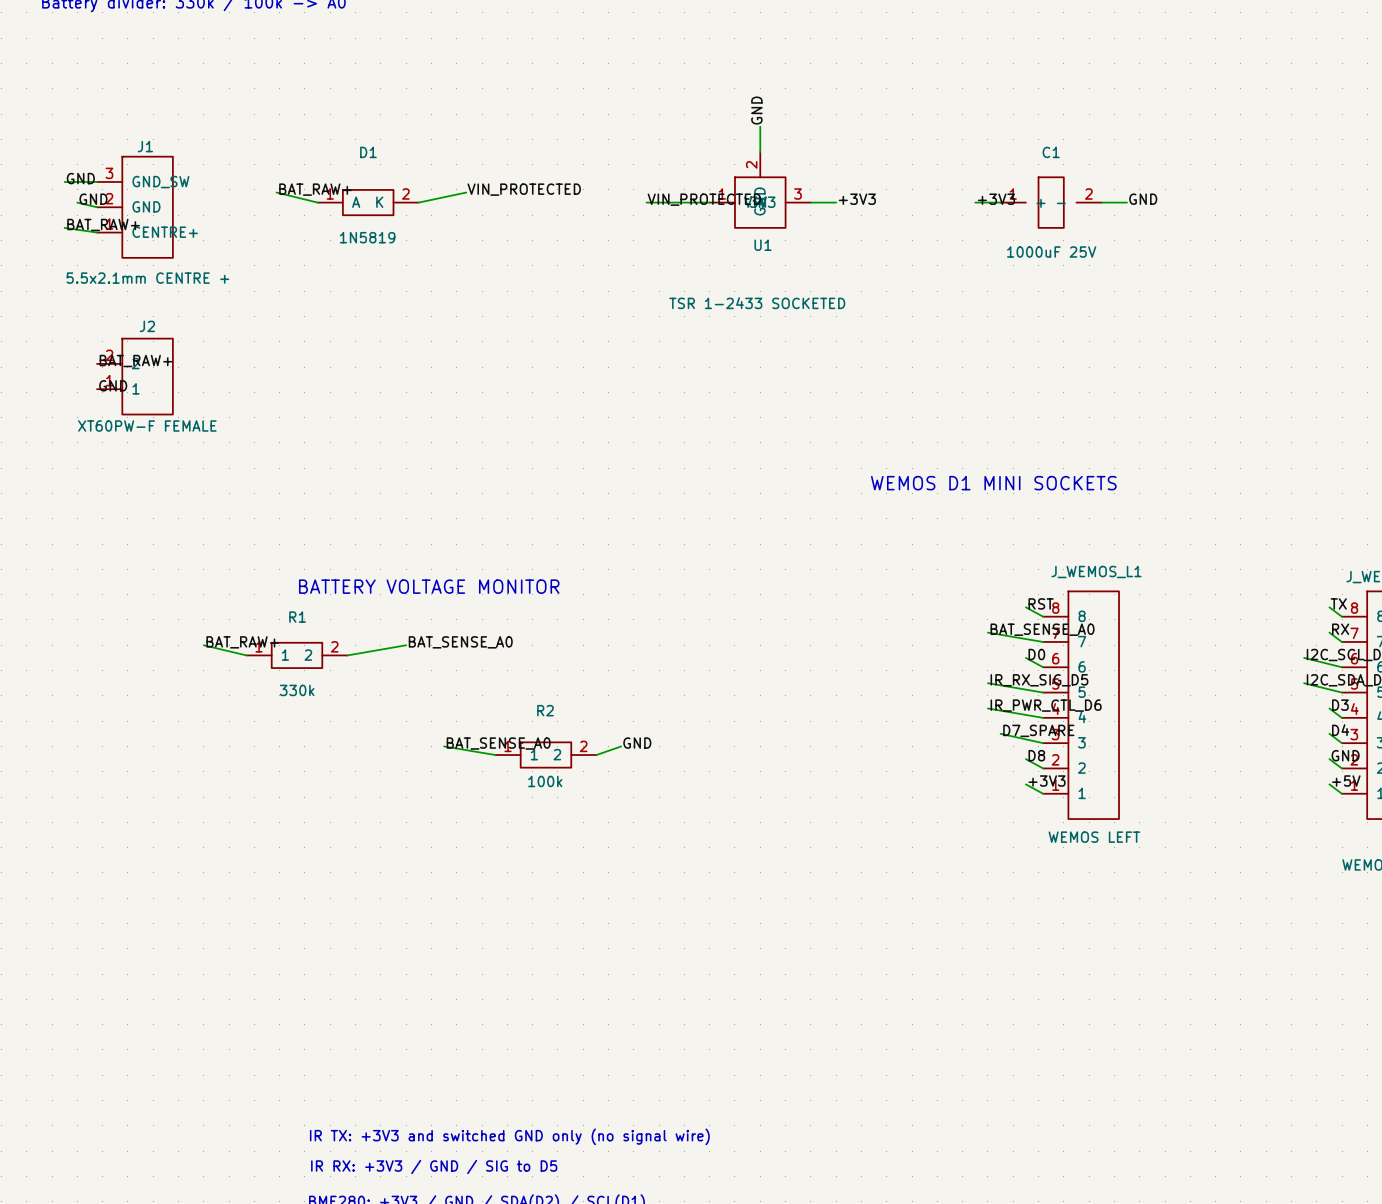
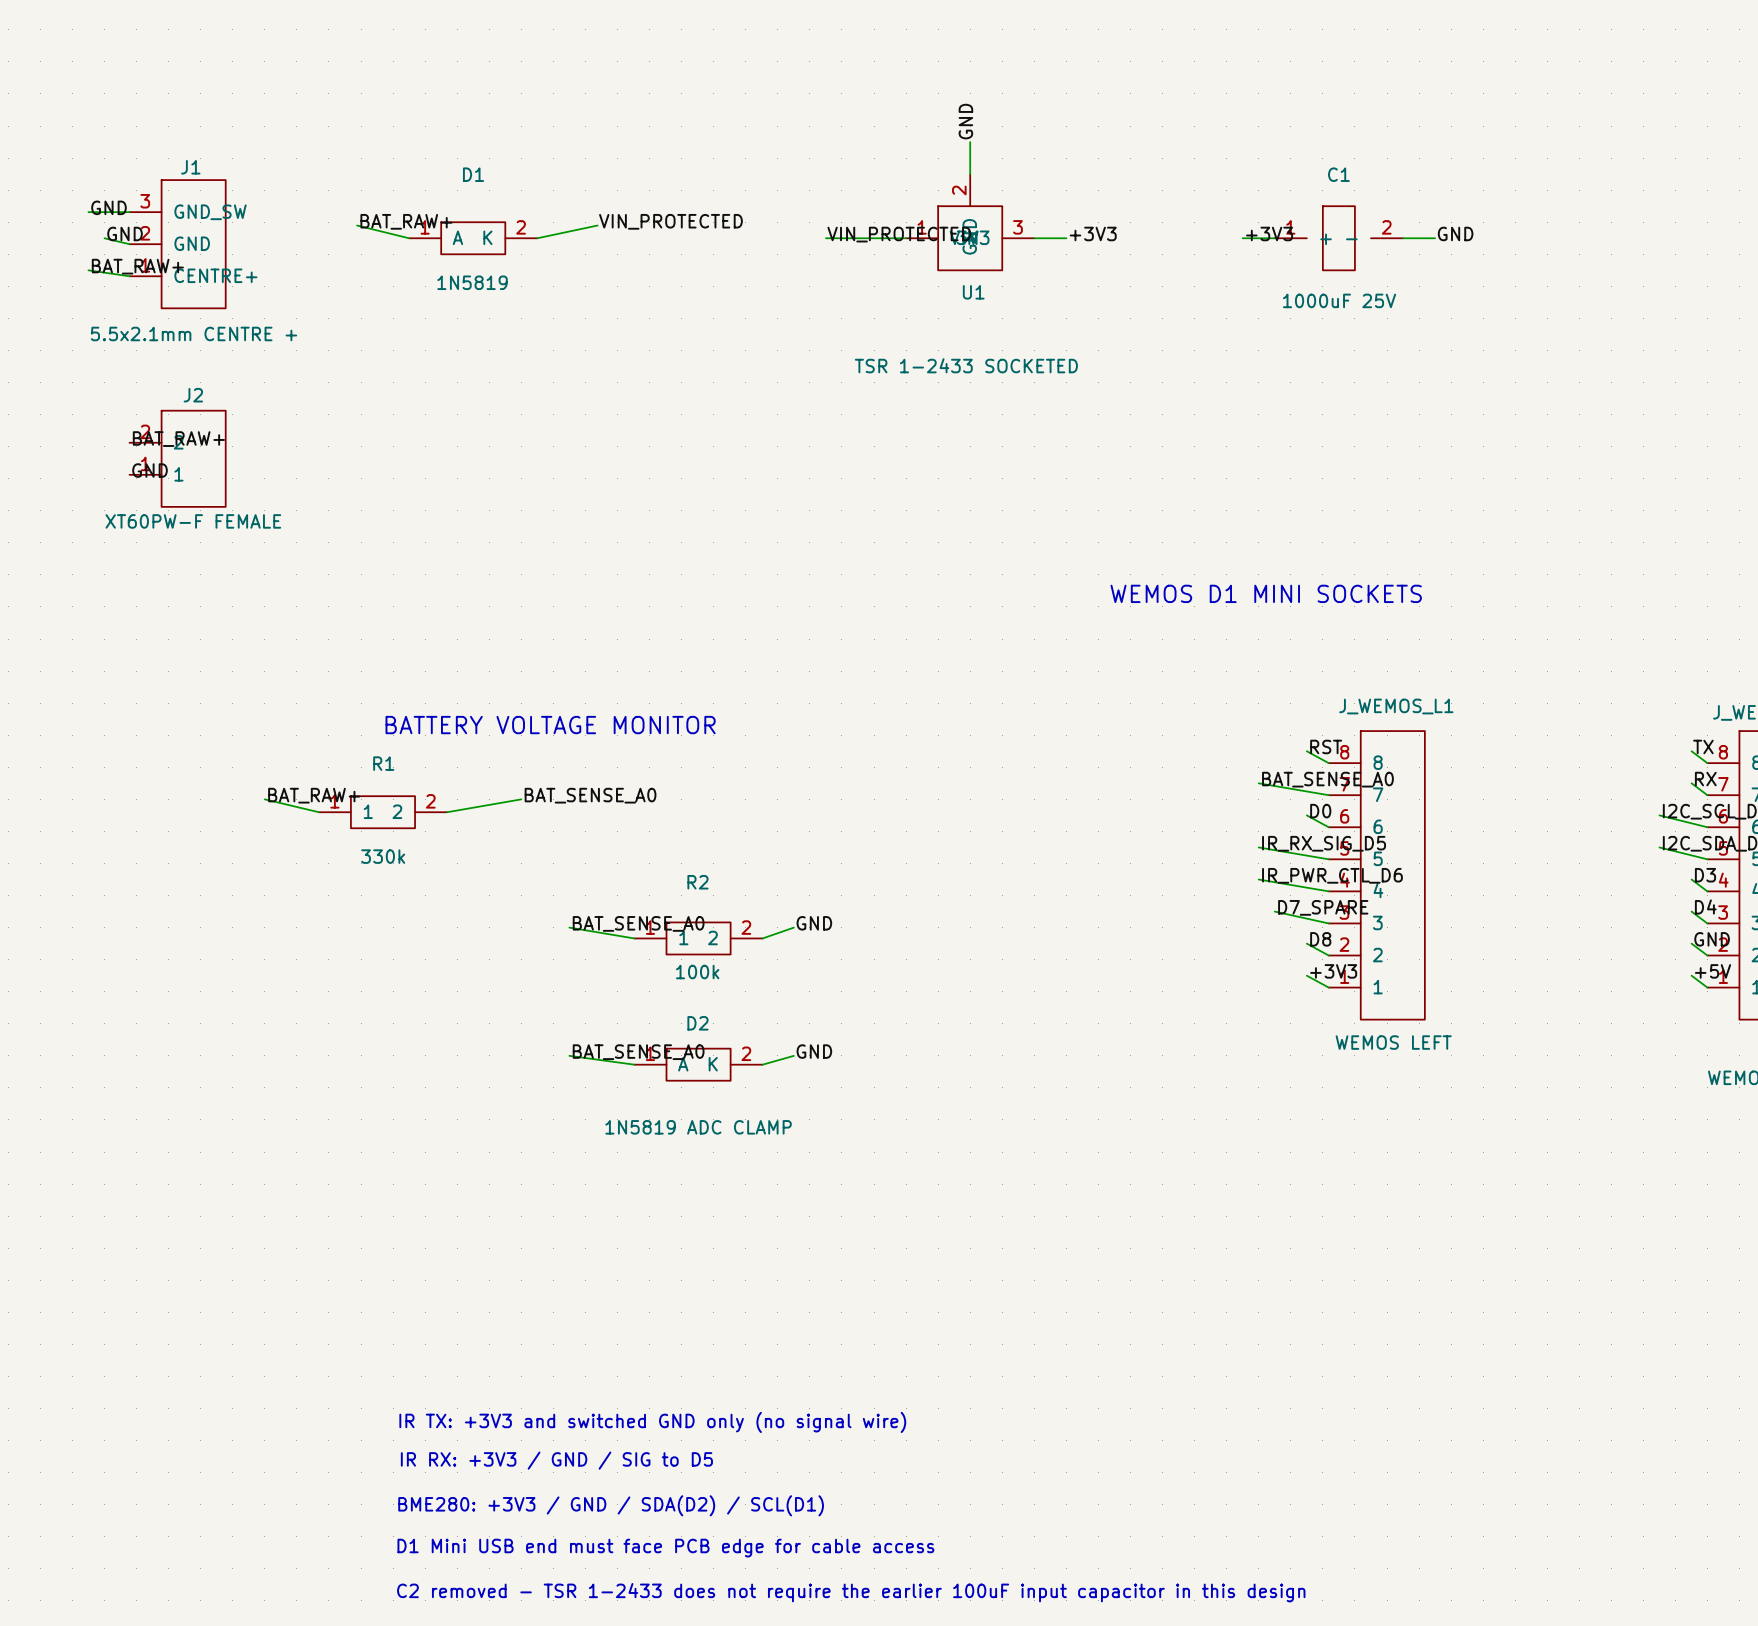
label: none -> BAT_SENSE_A0 (638, 1052)
label: none -> GND (814, 1051)
wire: none -> (569, 1055) (634, 1064)
wire: none -> (793, 1055) (762, 1064)
D2: none -> 1N5819 ADC CLAMP (698, 1064)

